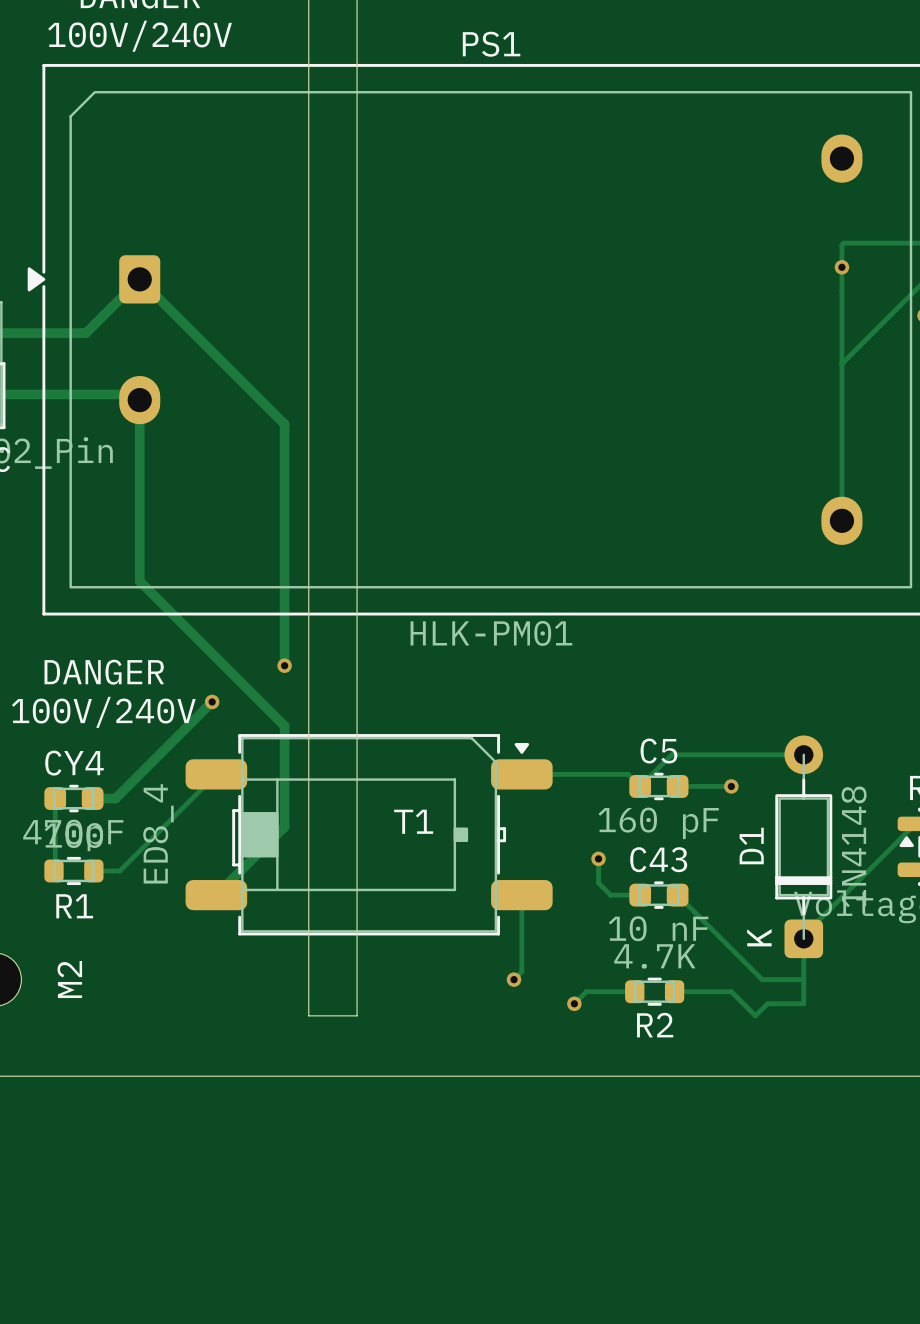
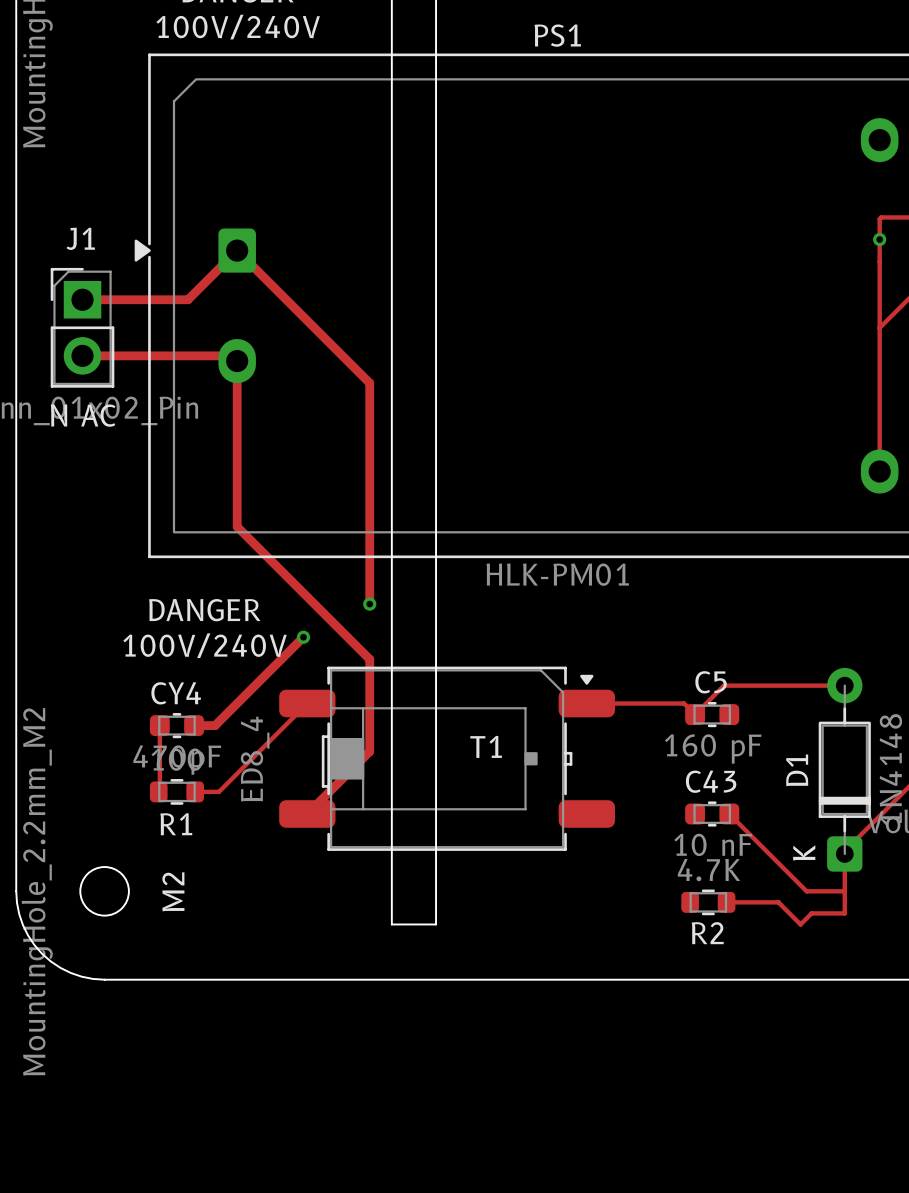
track: (677, 786) (731, 786) -> none
via: (731, 786) -> none
track: (598, 858) (598, 883) (610, 895) (640, 895) -> none
via: (598, 858) -> none
track: (521, 895) (521, 971) (514, 979) -> none
via: (514, 979) -> none
track: (634, 991) (586, 991) (574, 1003) -> none
via: (574, 1003) -> none

